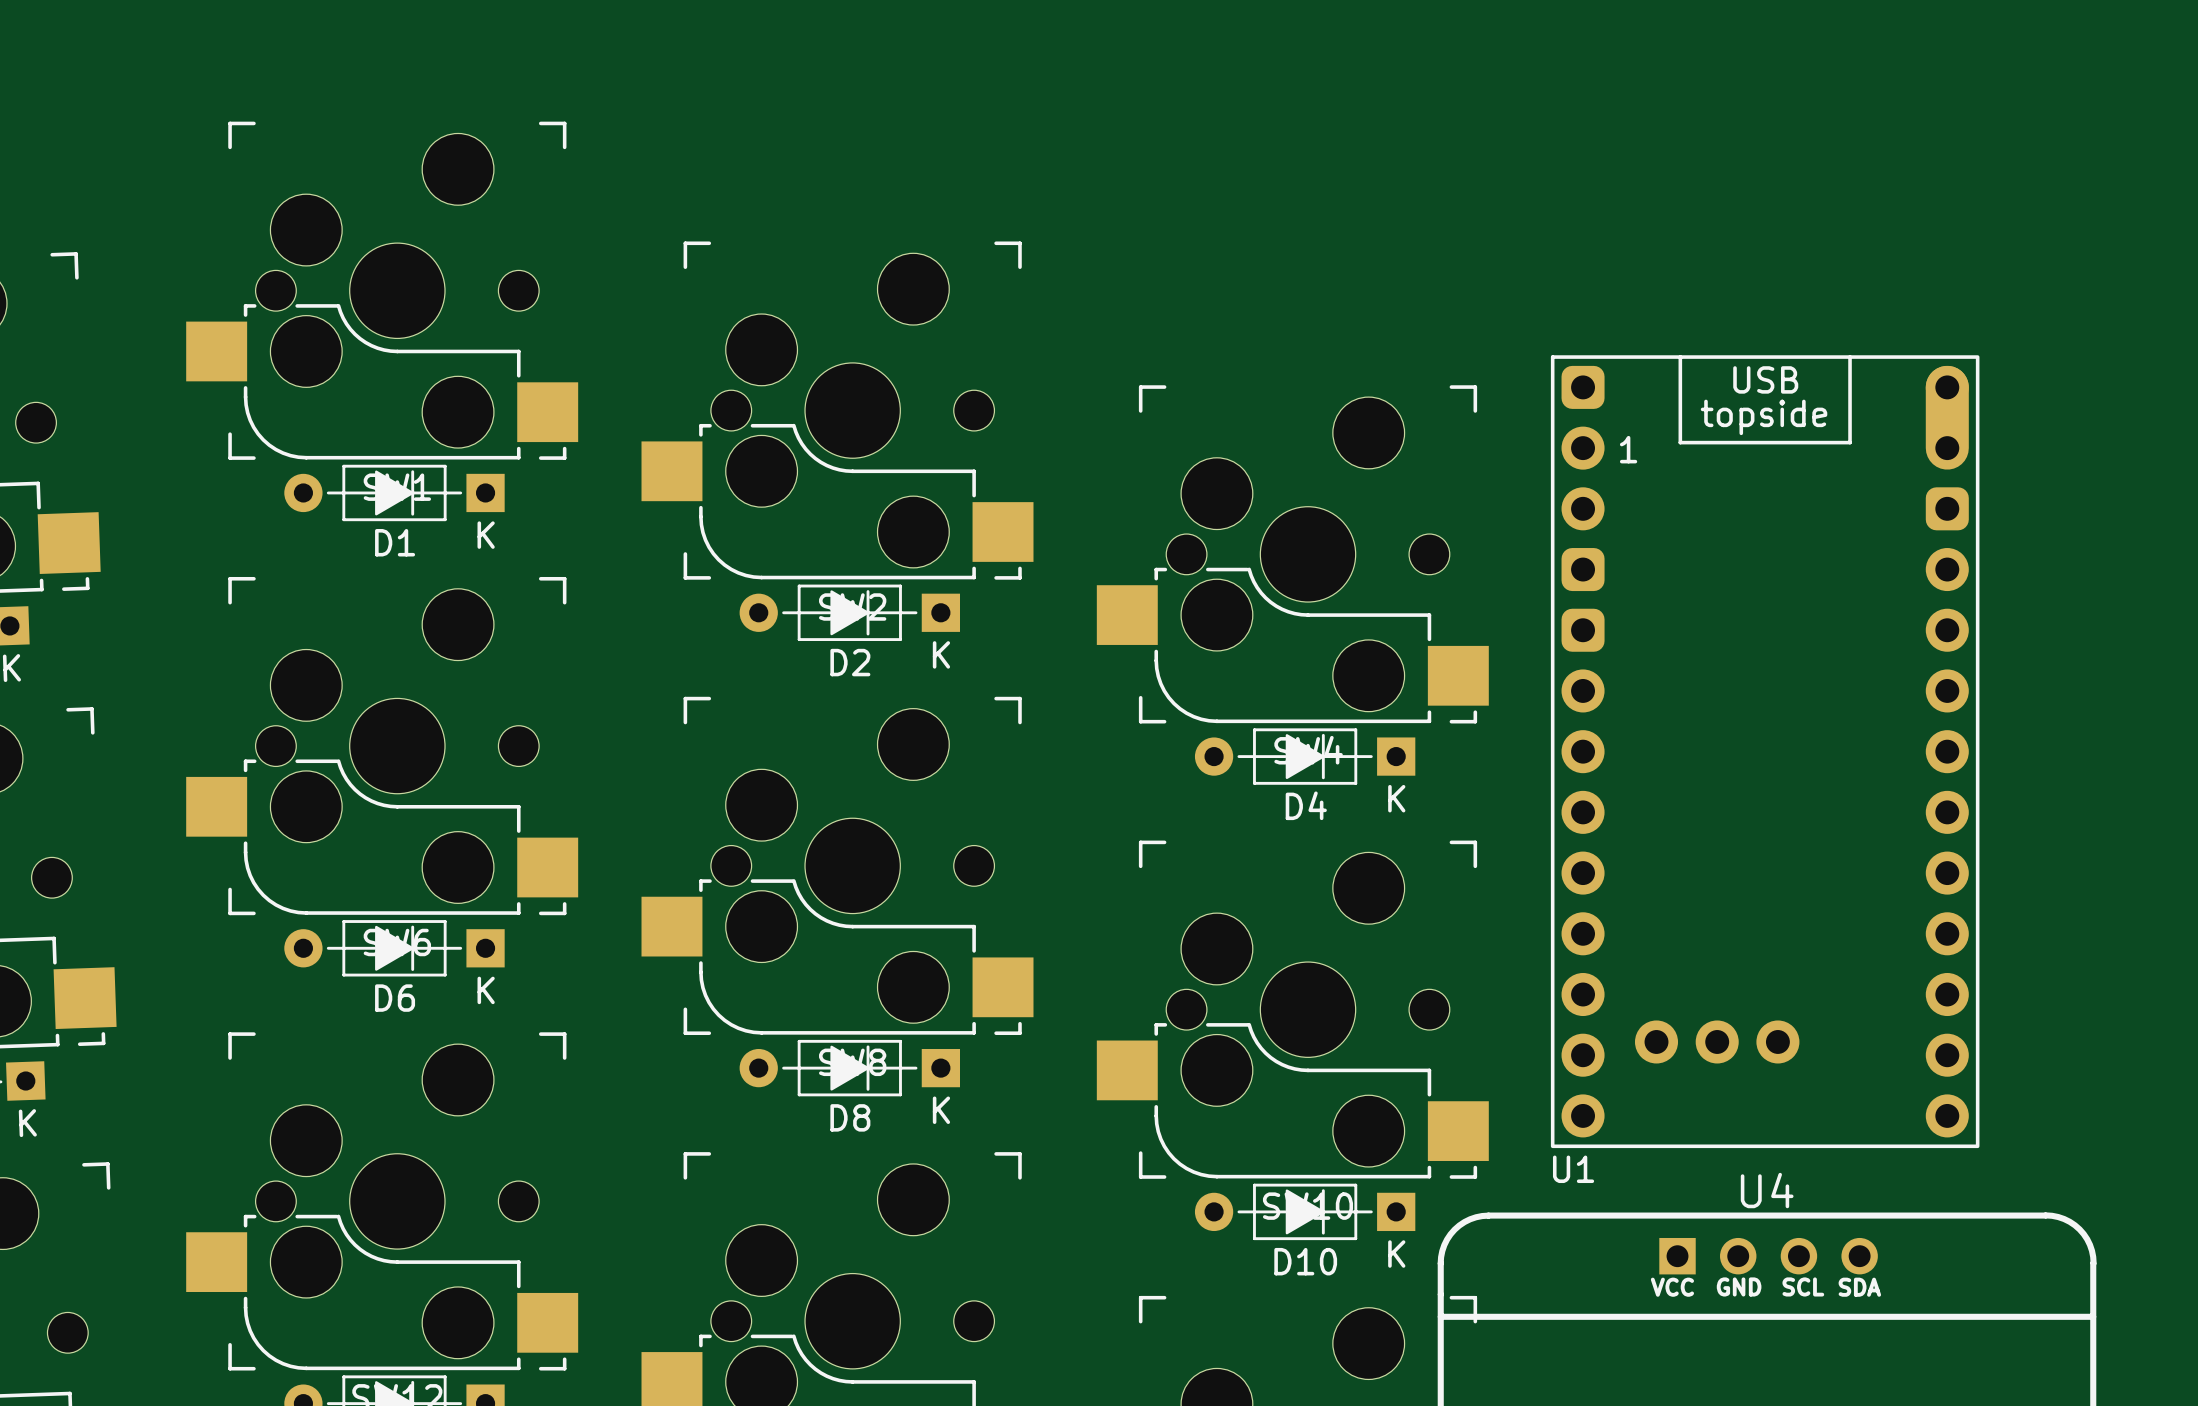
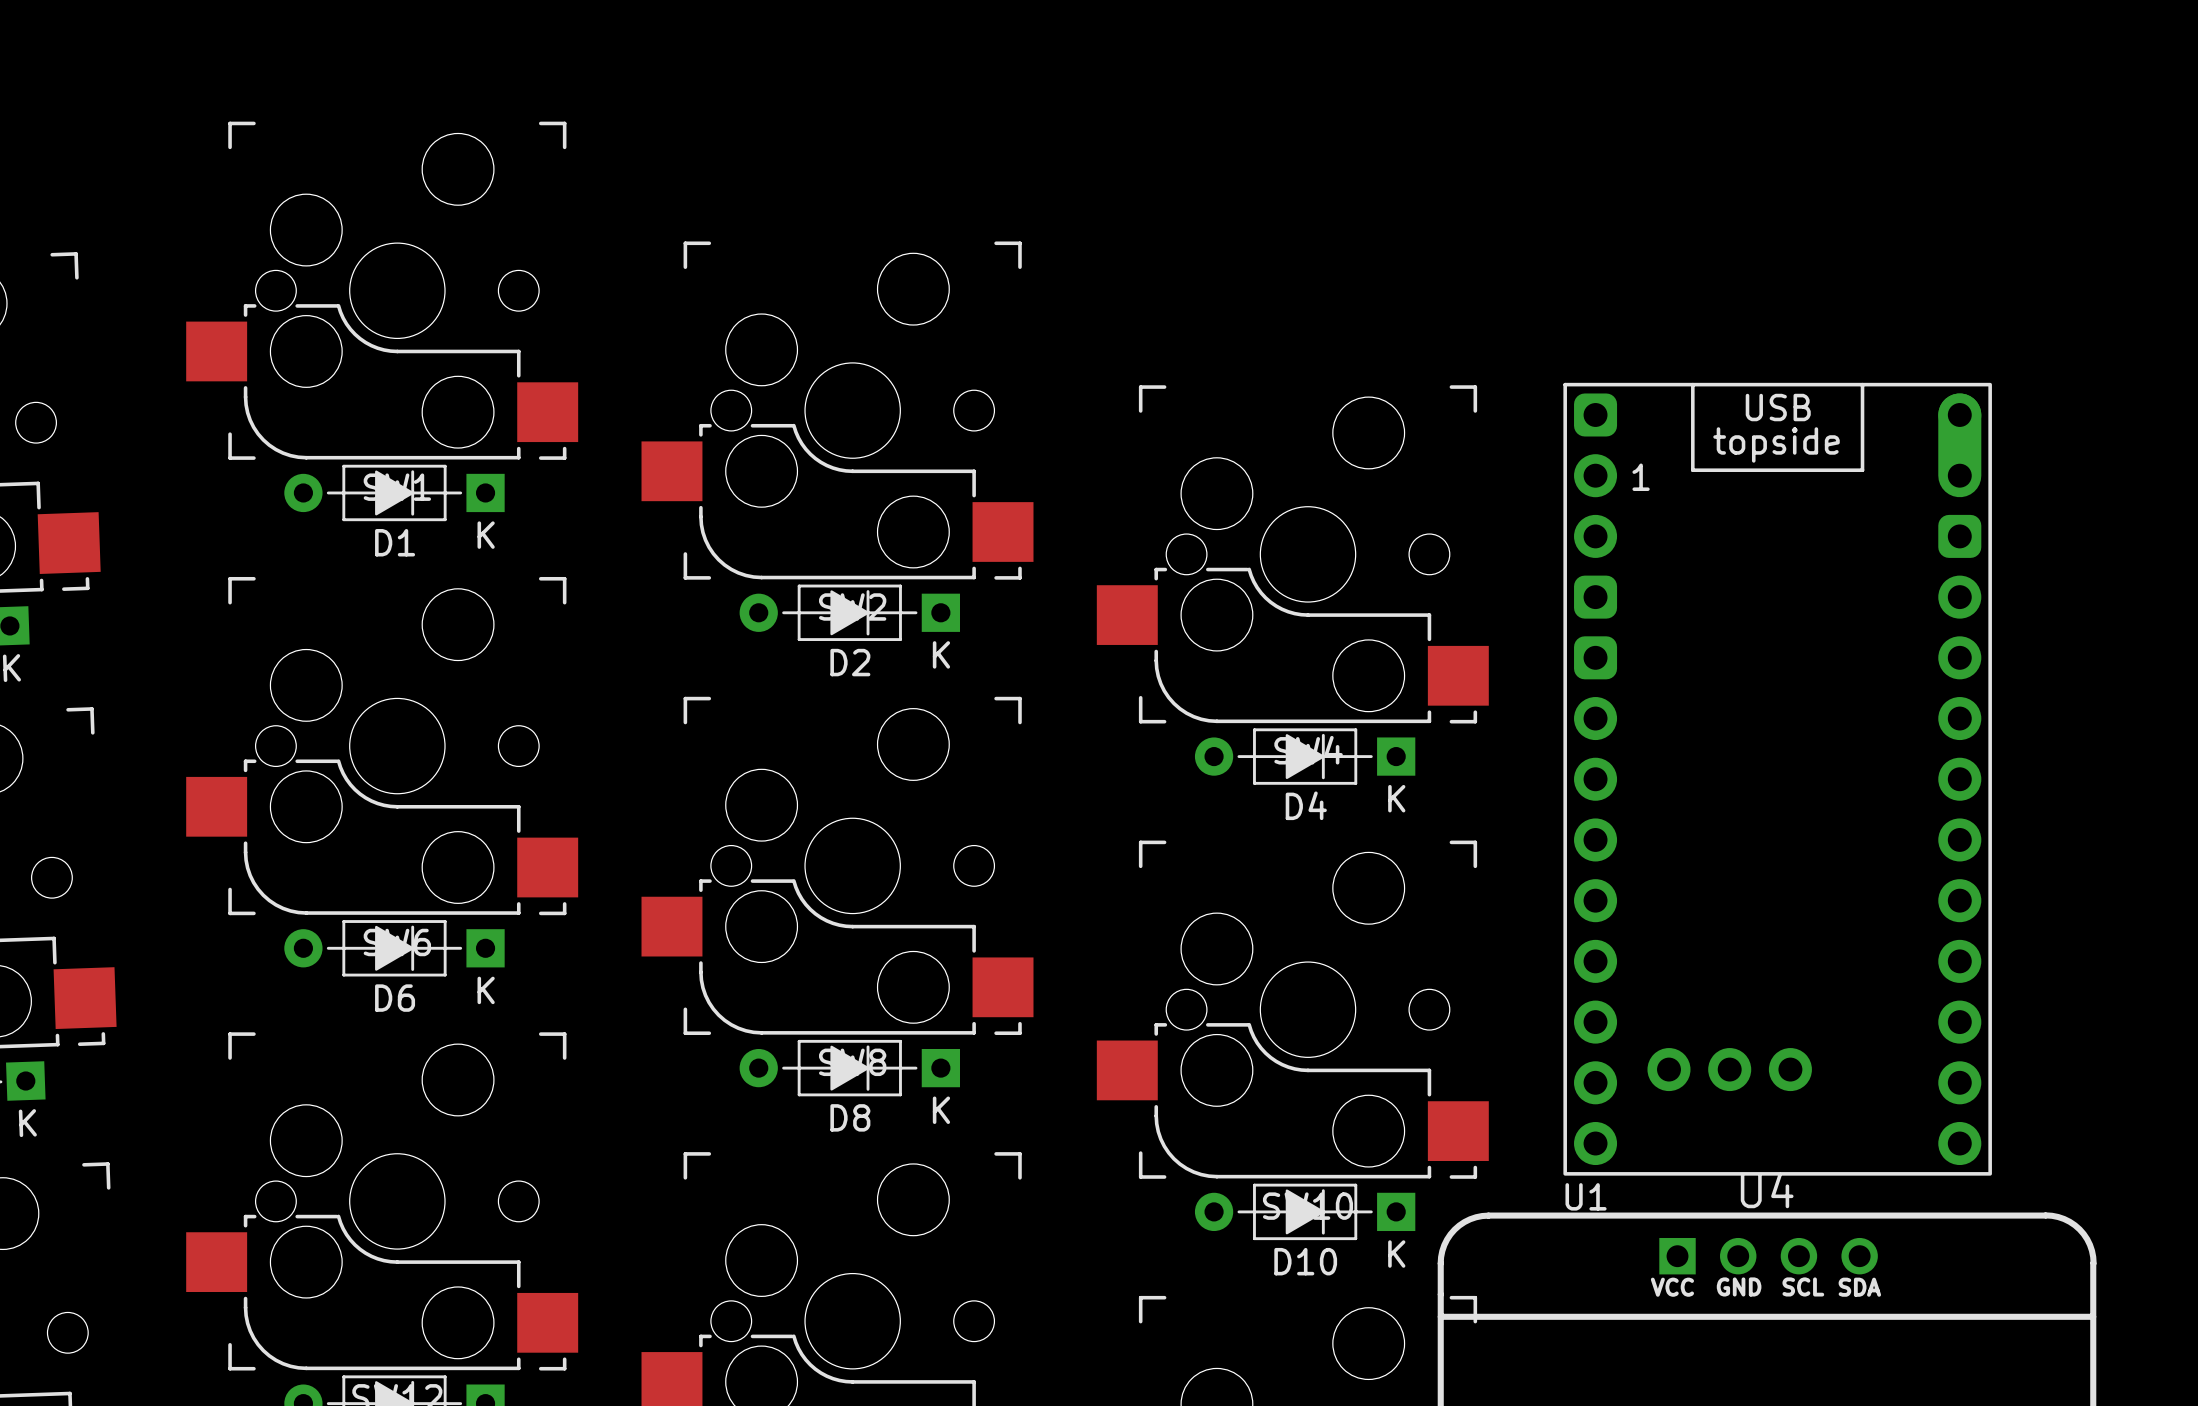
U1 position: (1765, 751) -> (1777, 779)

